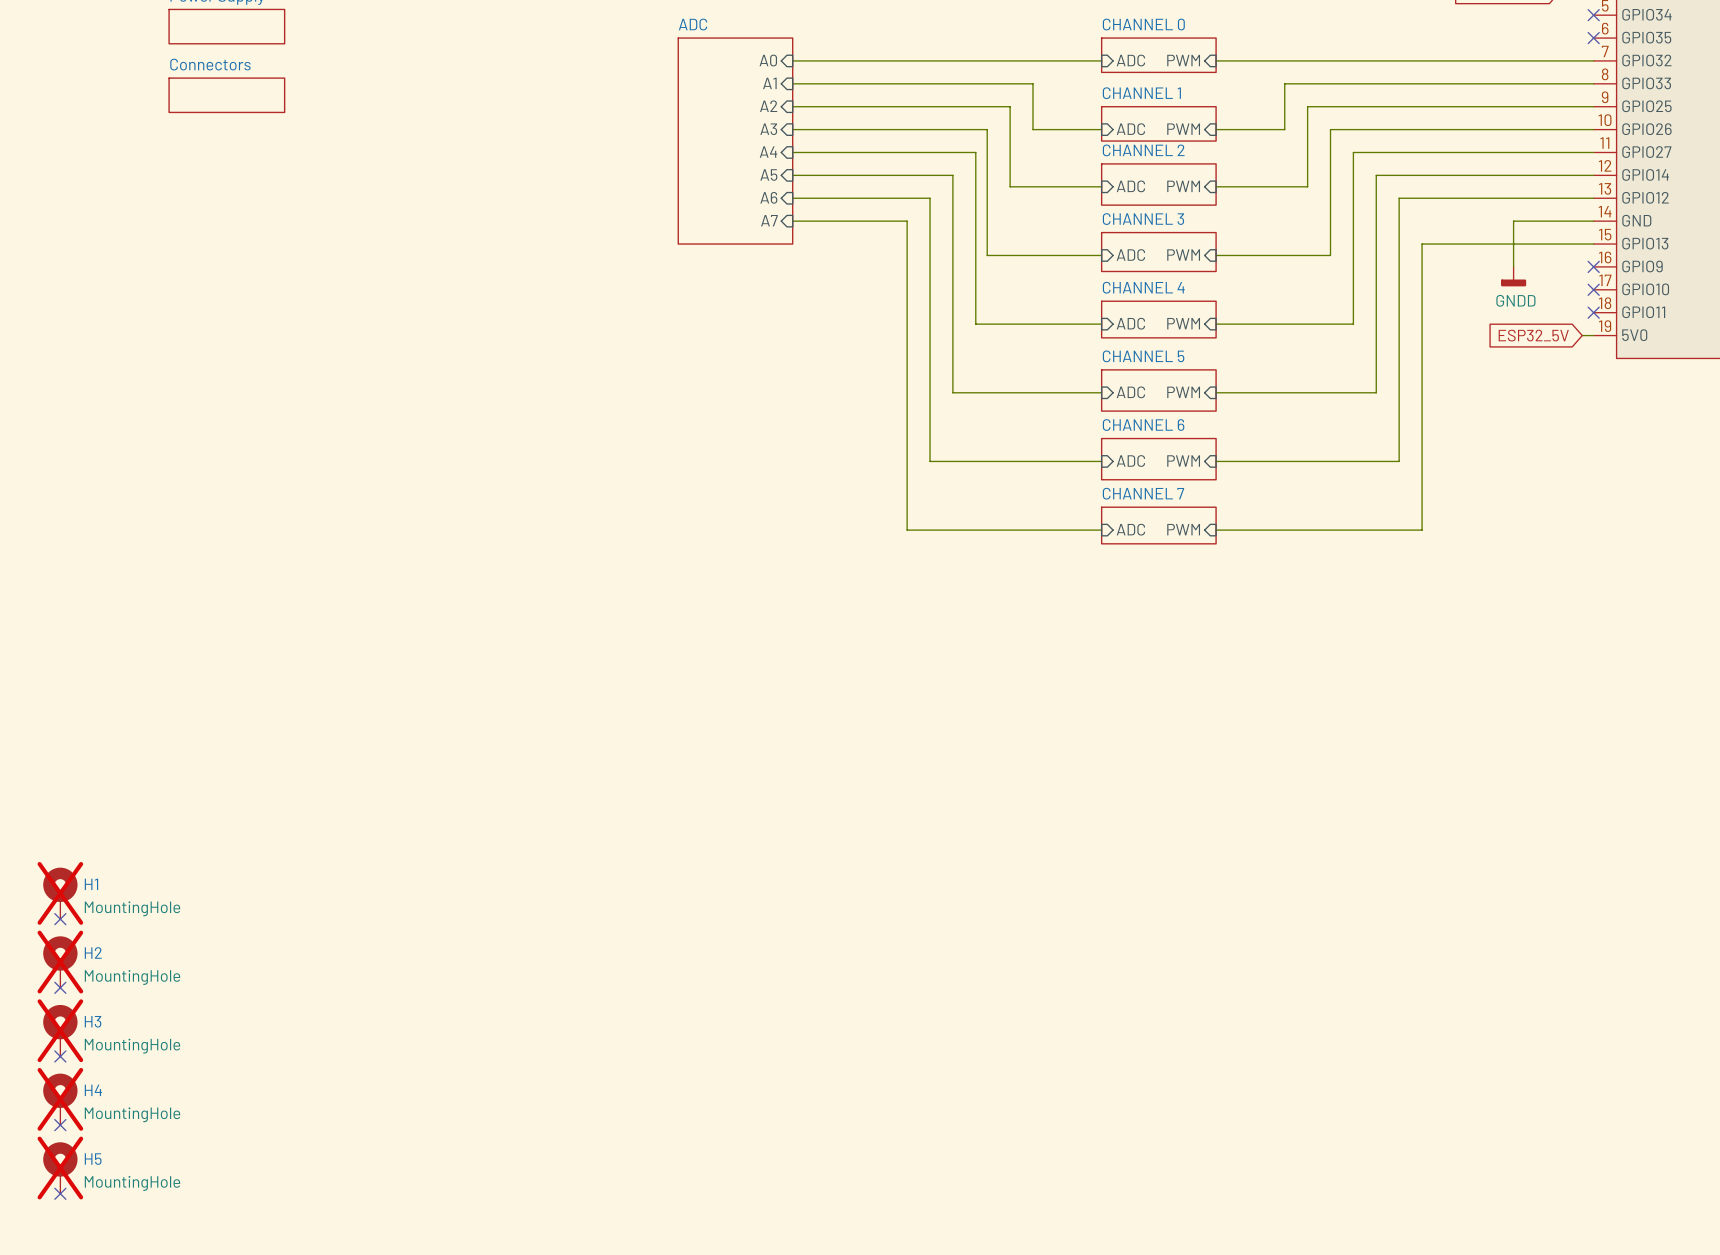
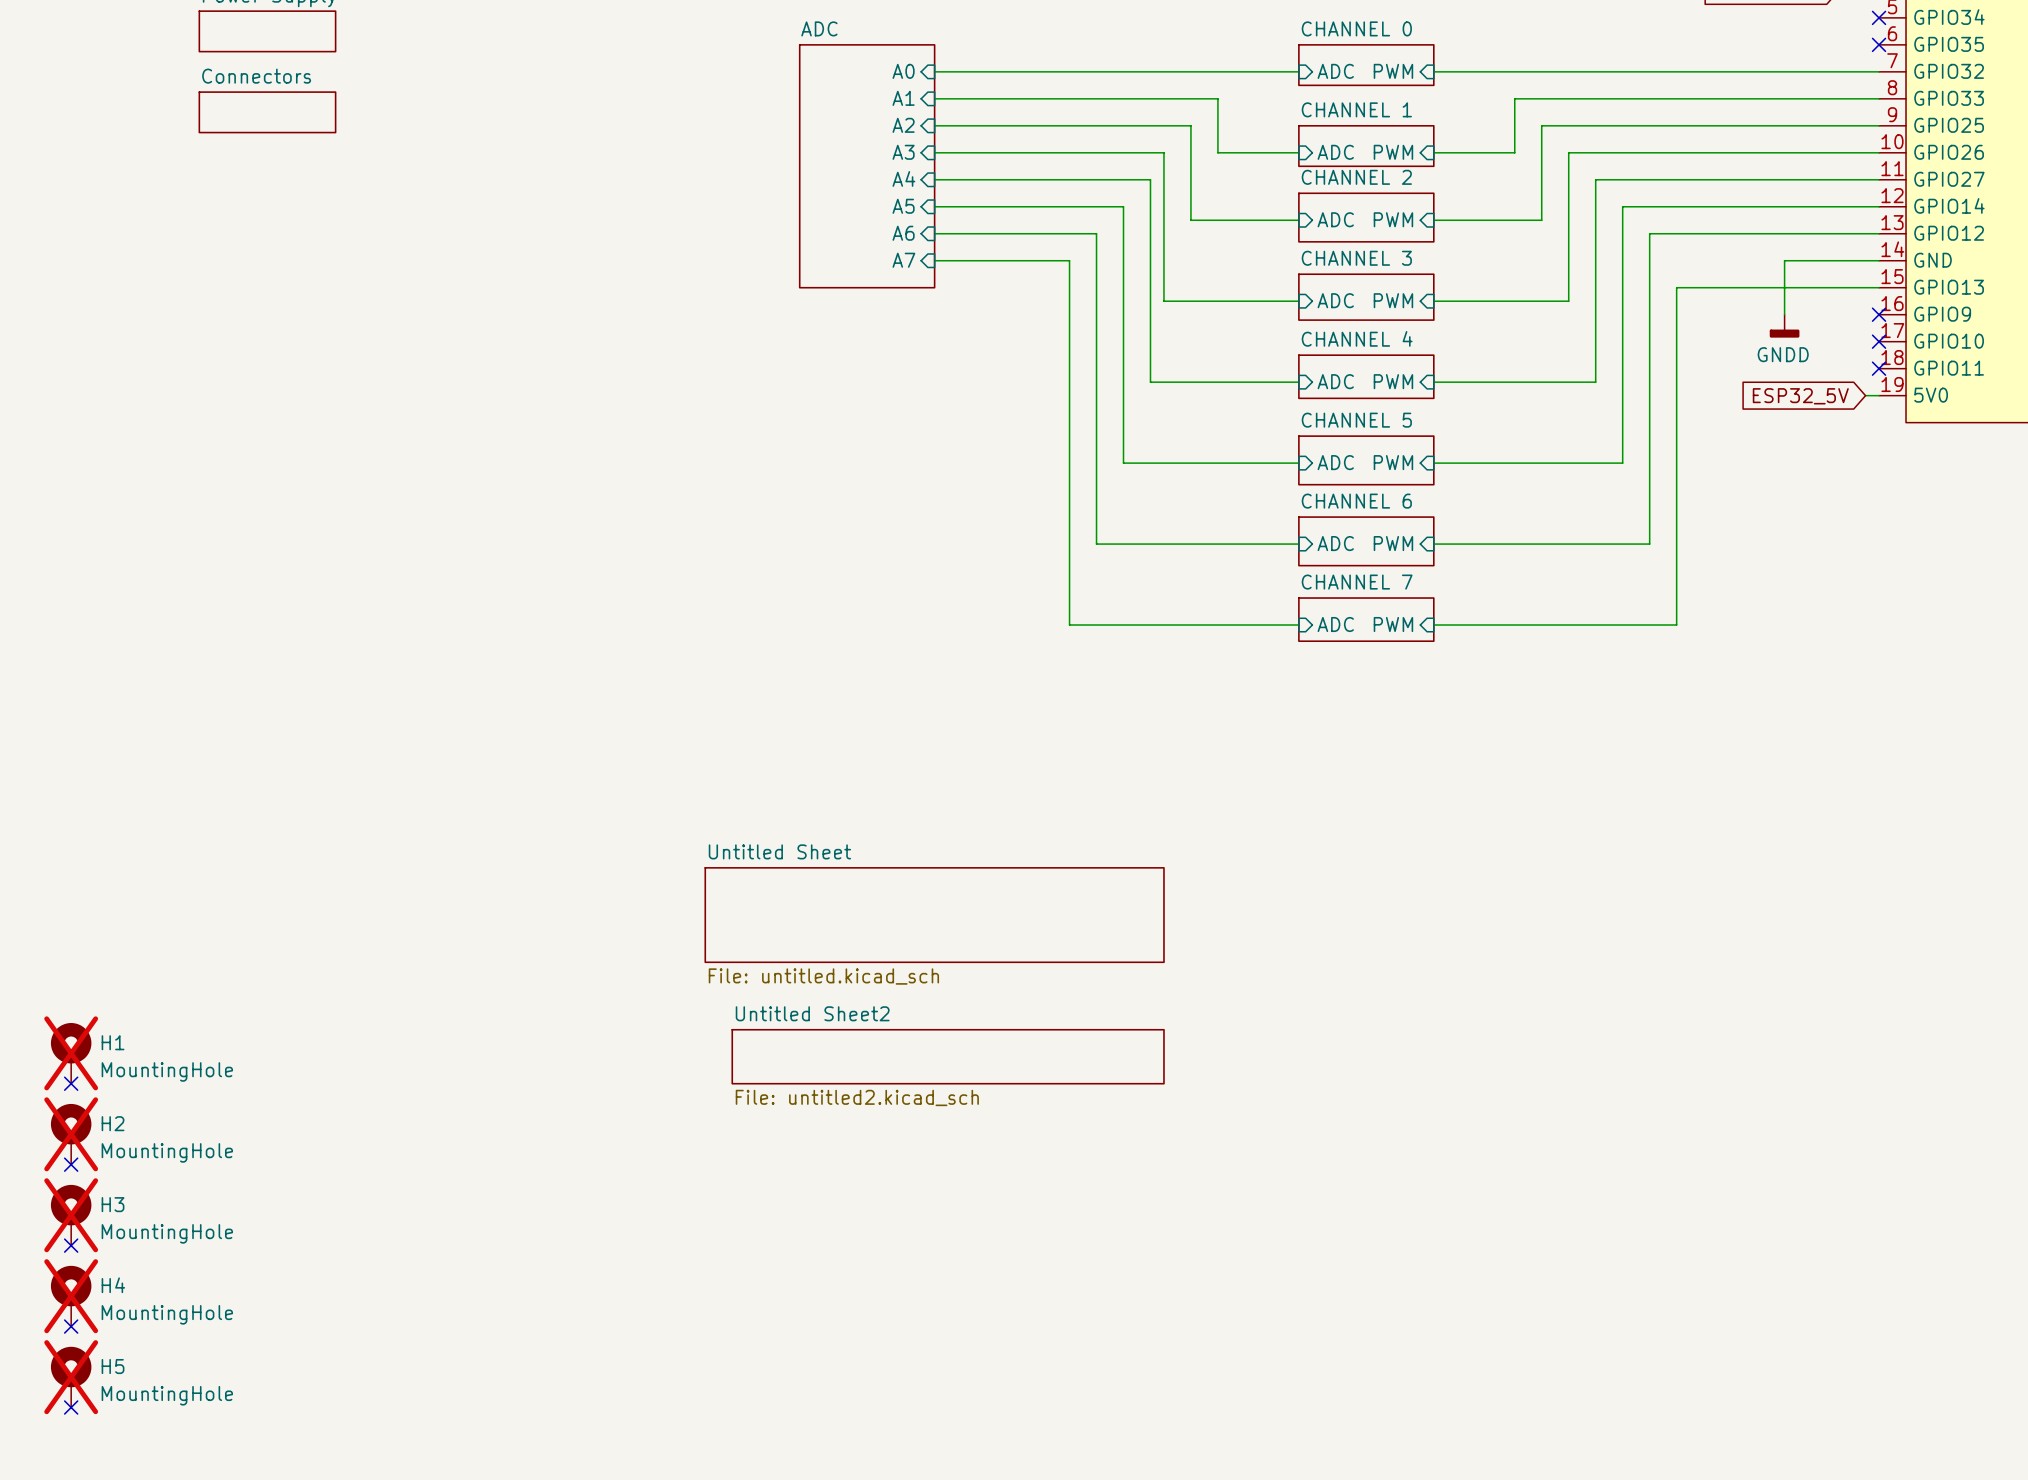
sheet Untitled Sheet: none -> File: untitled.kicad_sch (934, 915)
sheet Untitled Sheet2: none -> File: untitled2.kicad_sch (948, 1056)

